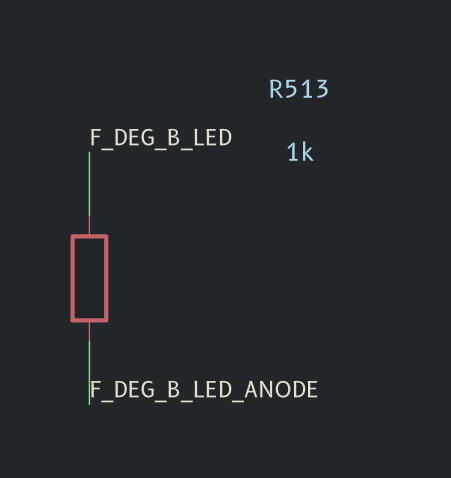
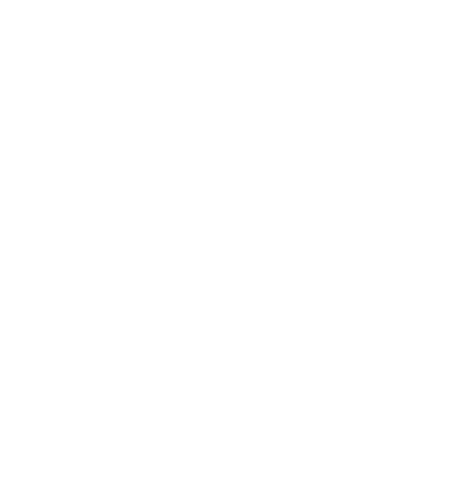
label: F_DEG_B_LED (161, 139) -> none
wire: (89, 152) (89, 215) -> none
R513: 1k (89, 278) -> none
wire: (89, 341) (89, 404) -> none
label: F_DEG_B_LED_ANODE (204, 391) -> none

